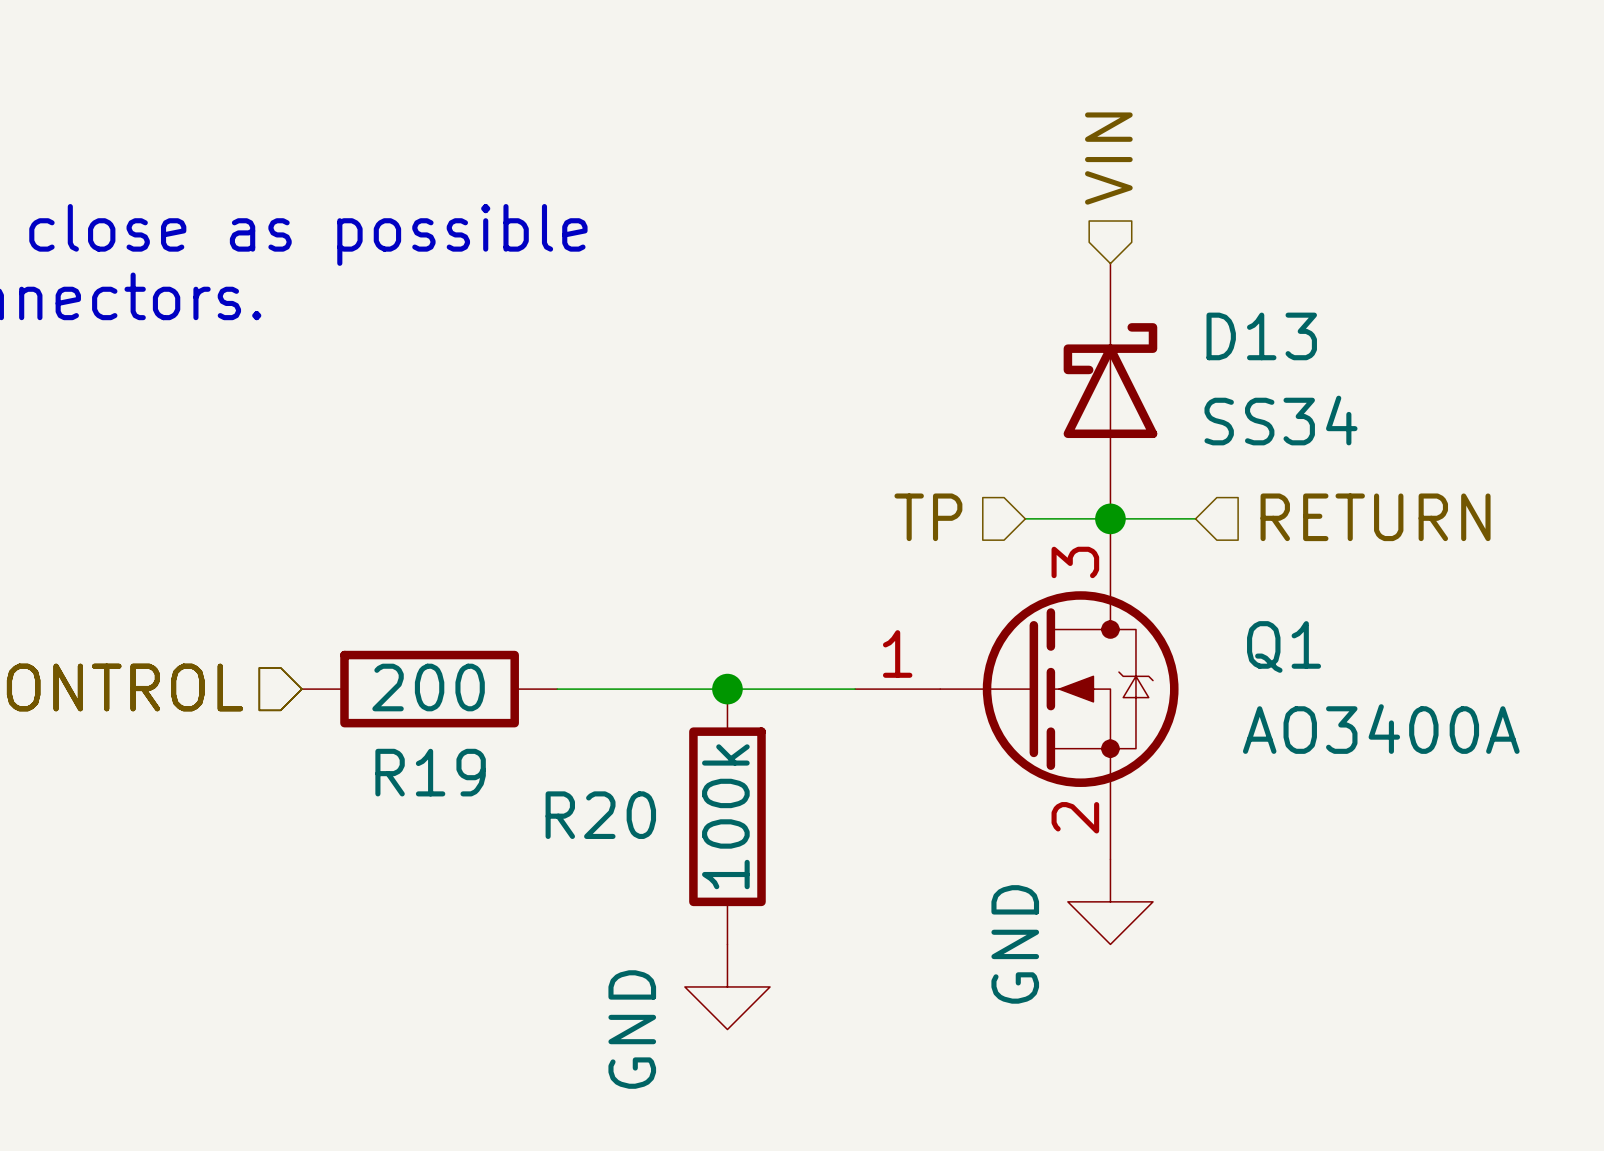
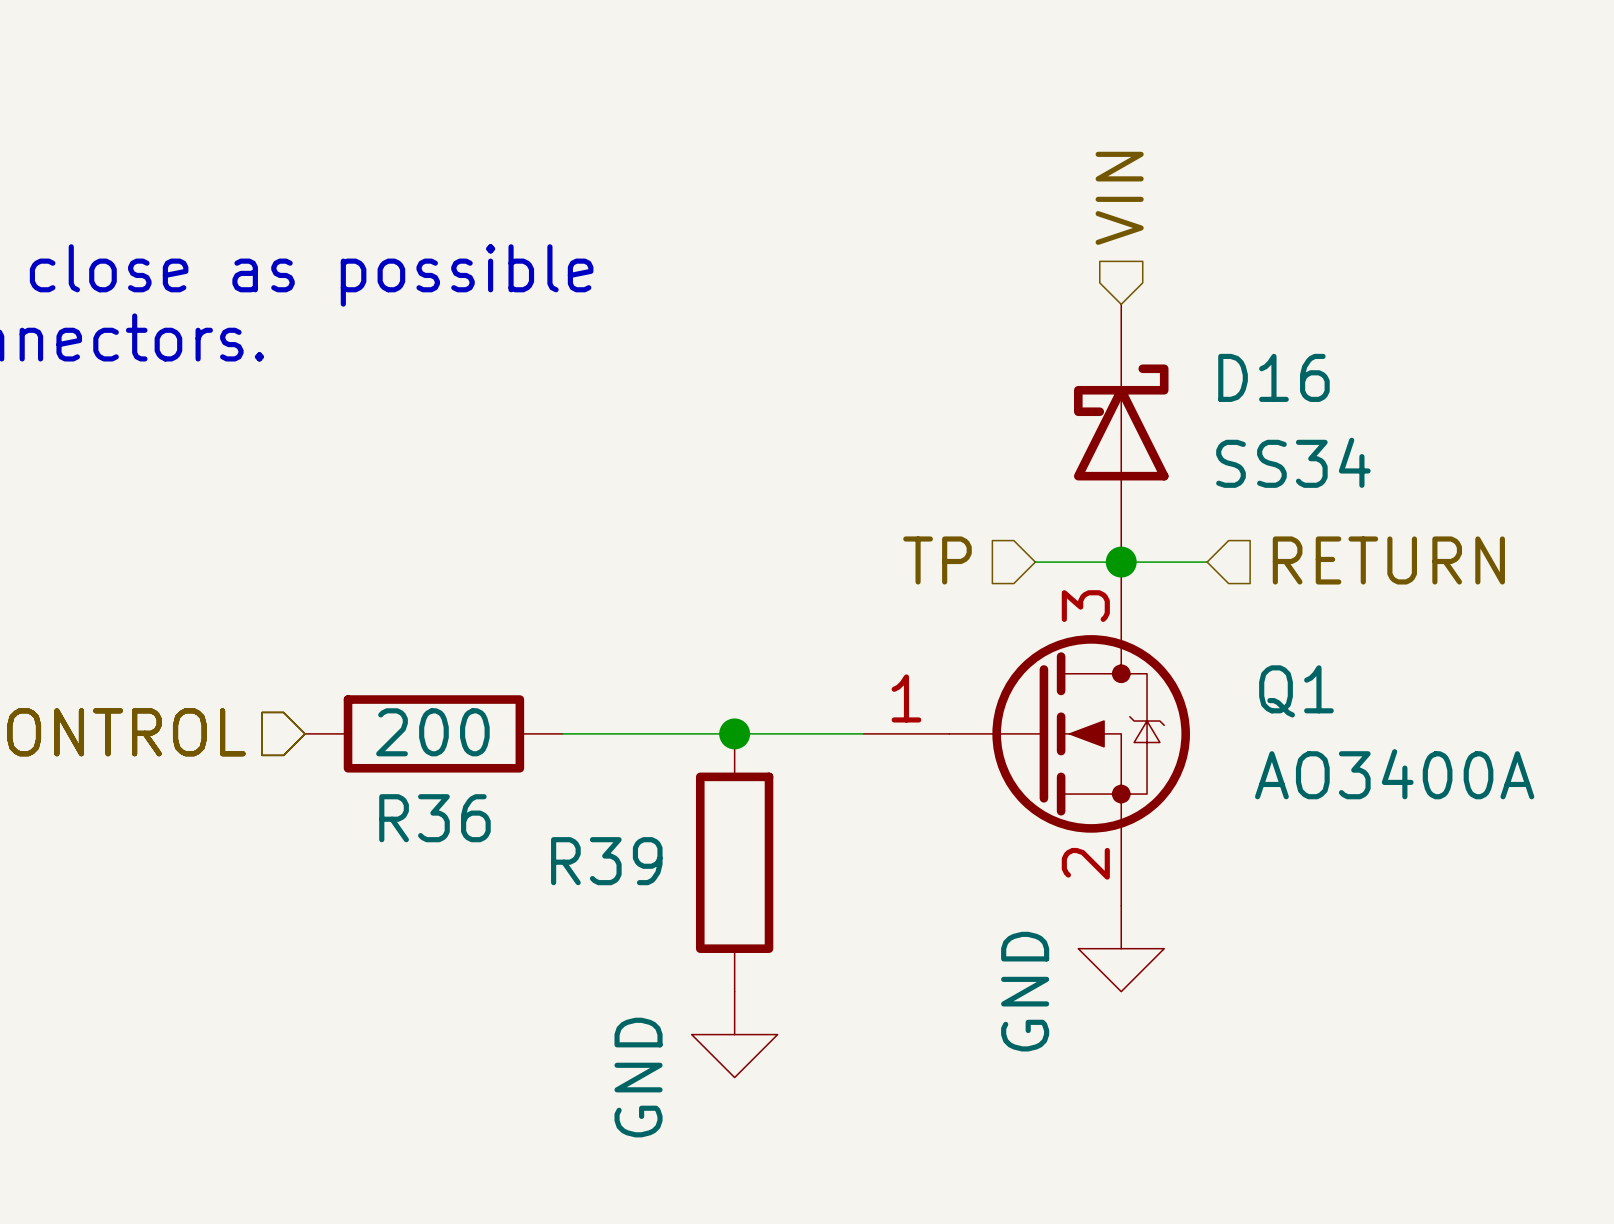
D13 name: D13 (1261, 336) -> D16 (1273, 377)
R19 name: R19 (430, 772) -> R36 (434, 818)
R20 name: R20 (600, 815) -> R39 (606, 861)
R20 value: 100k (725, 816) -> none

